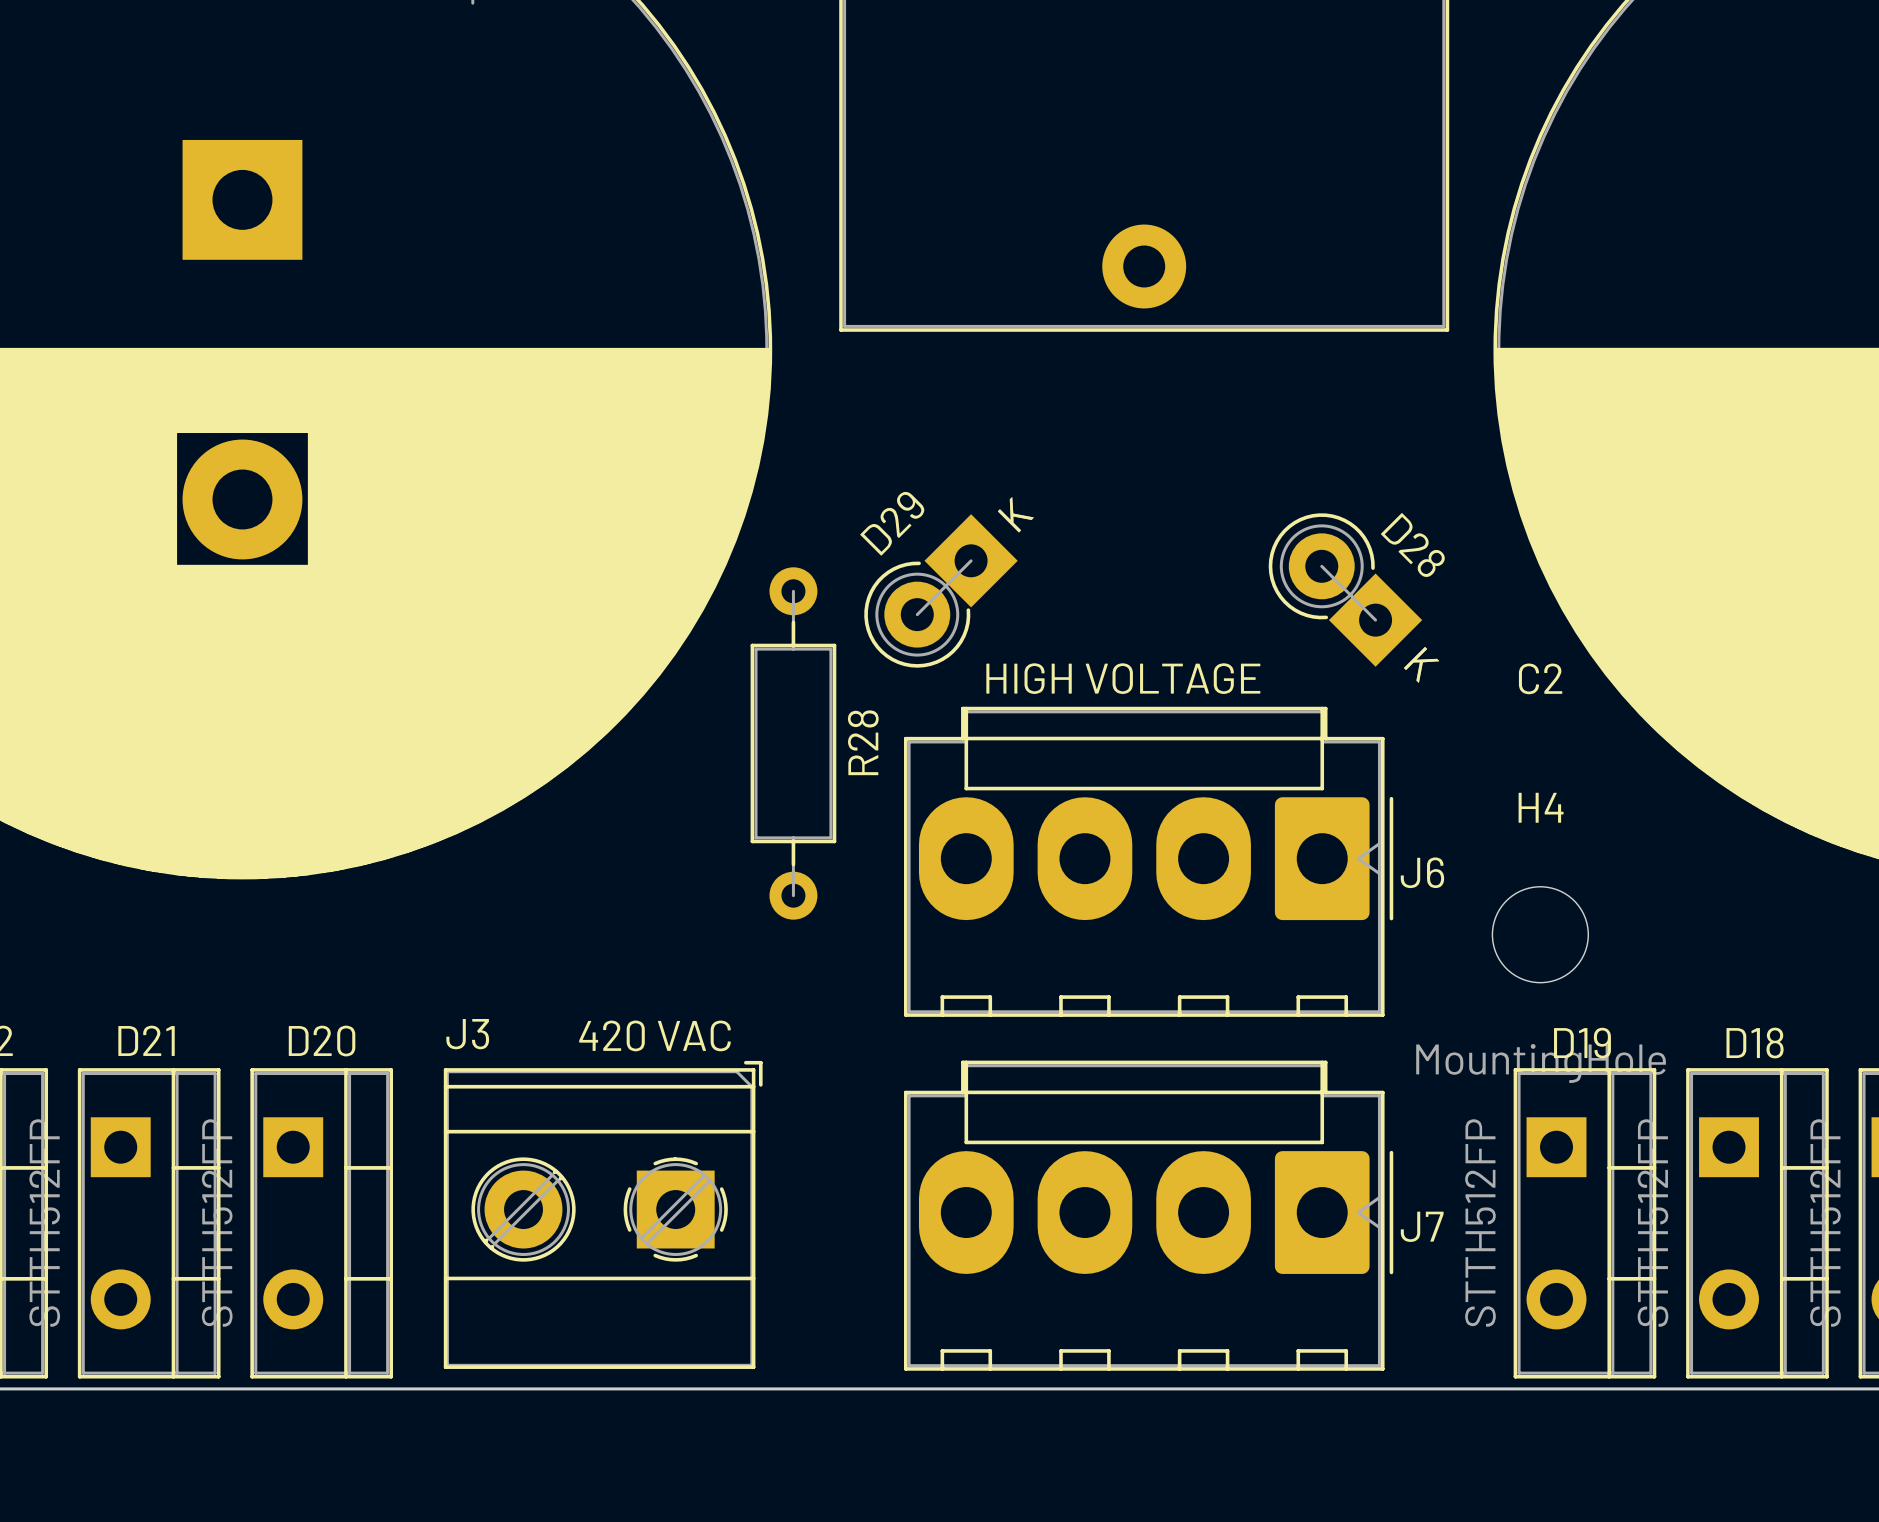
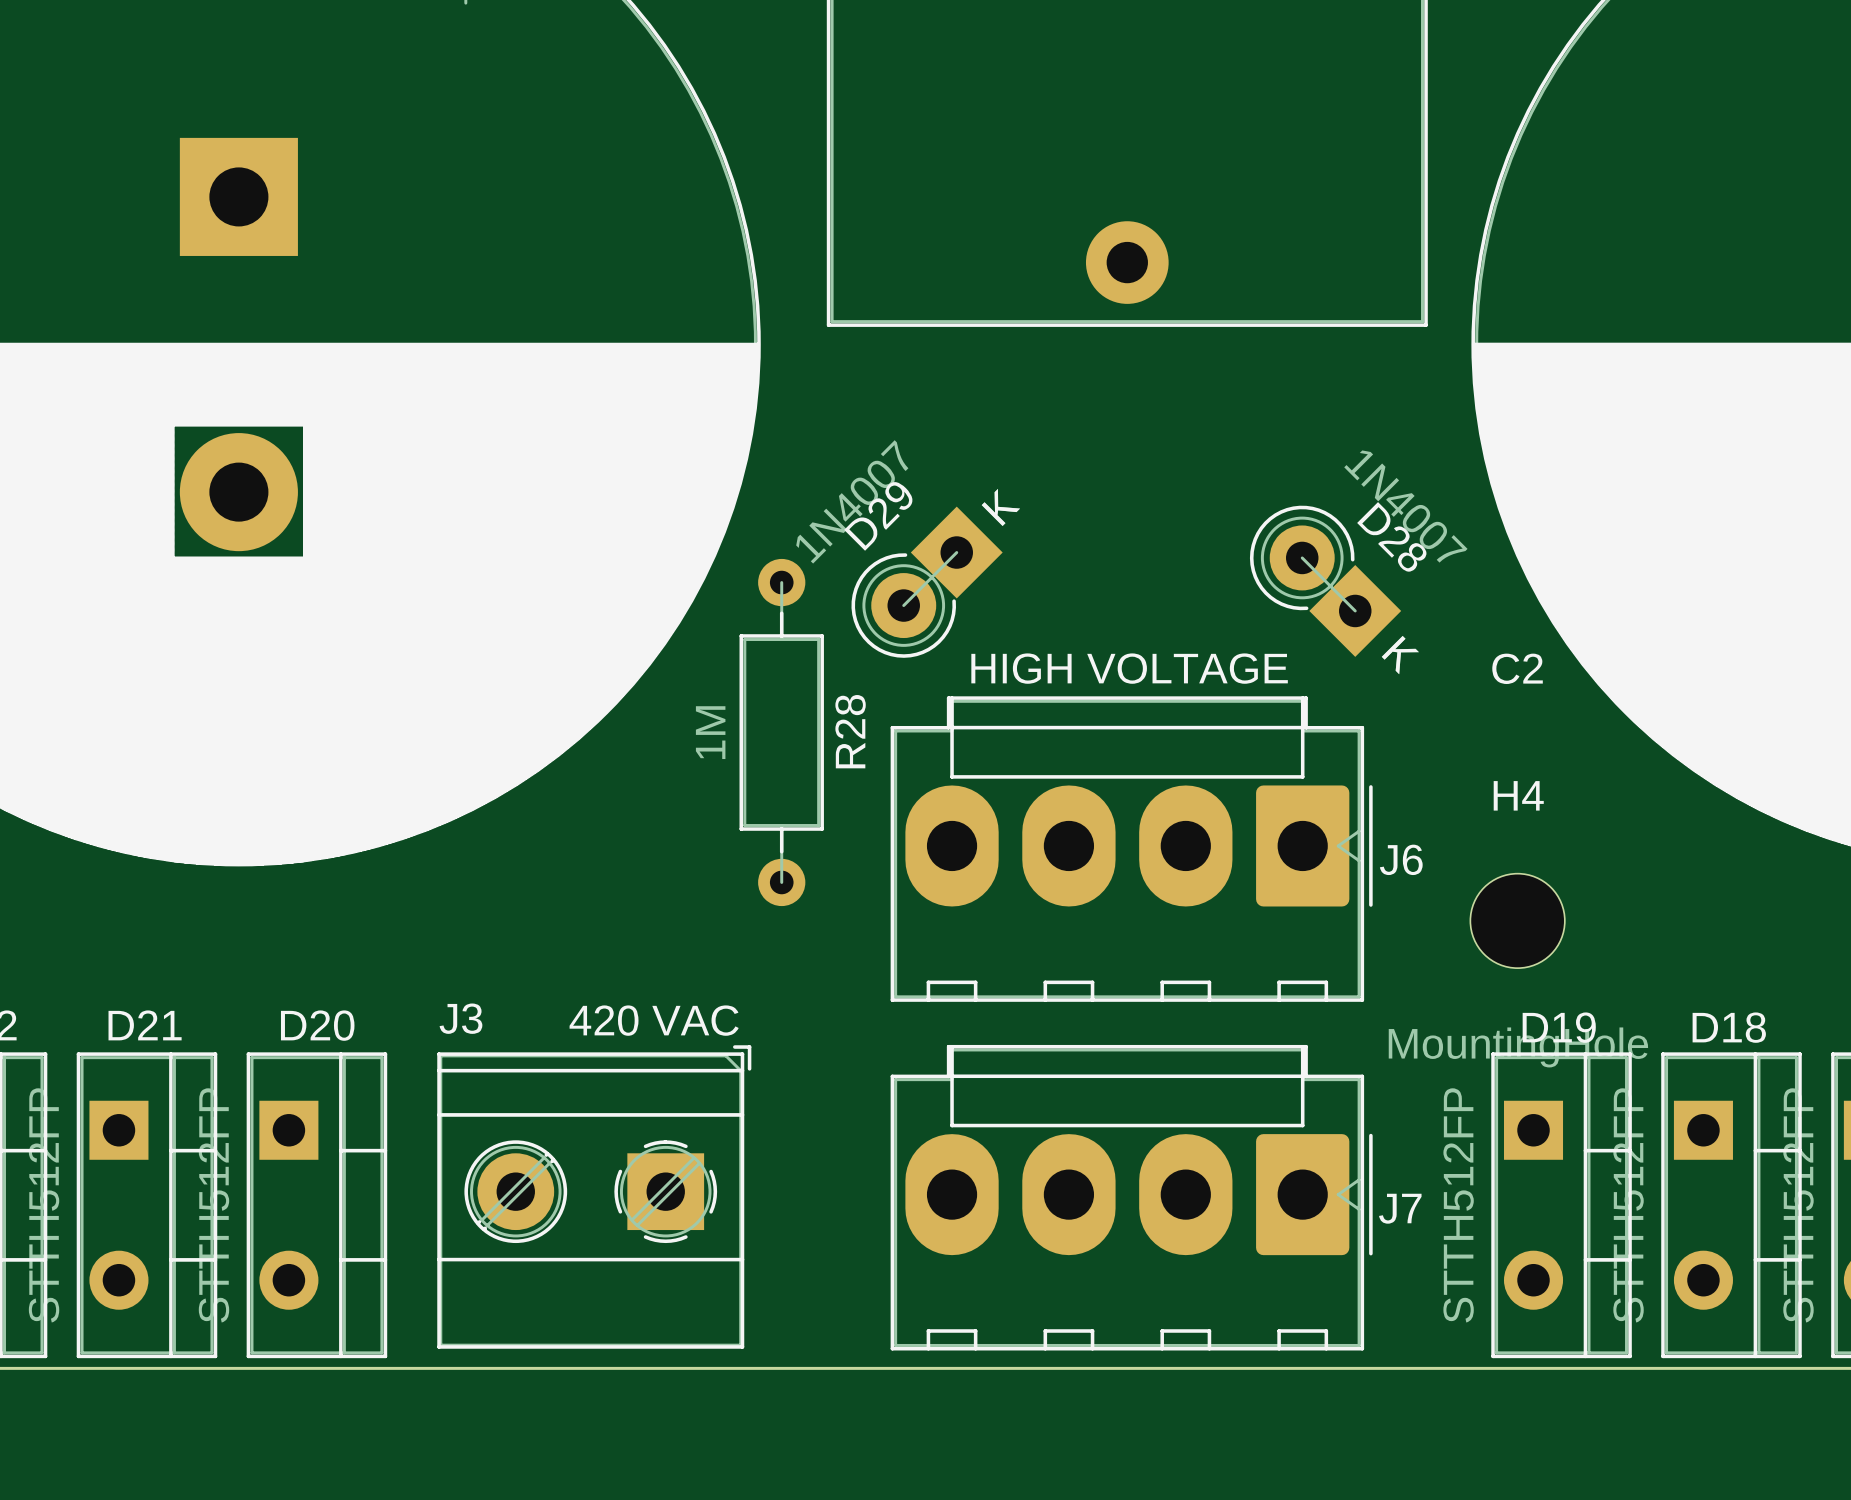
D29 value: none -> 1N4007 (852, 501)
D28 value: none -> 1N4007 (1405, 506)
R28 value: none -> 1M (710, 732)

